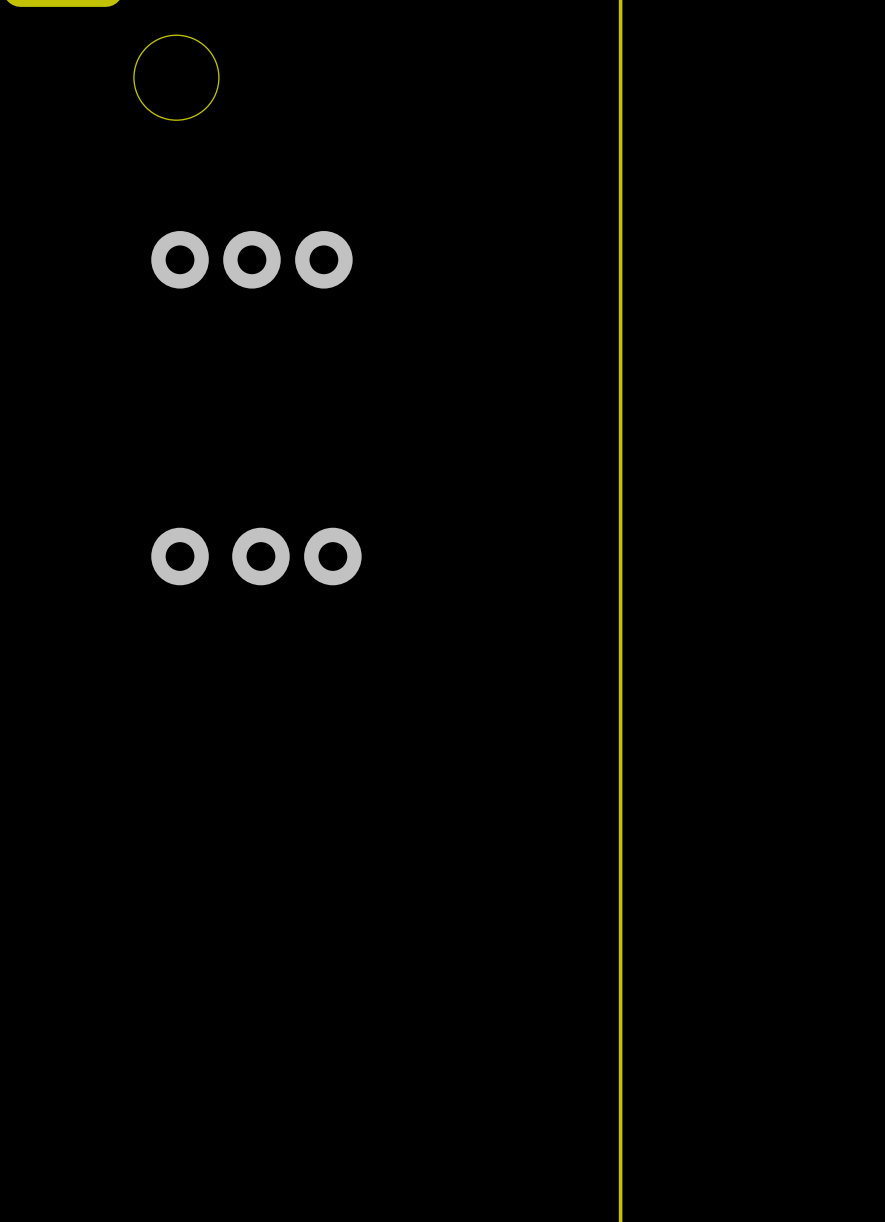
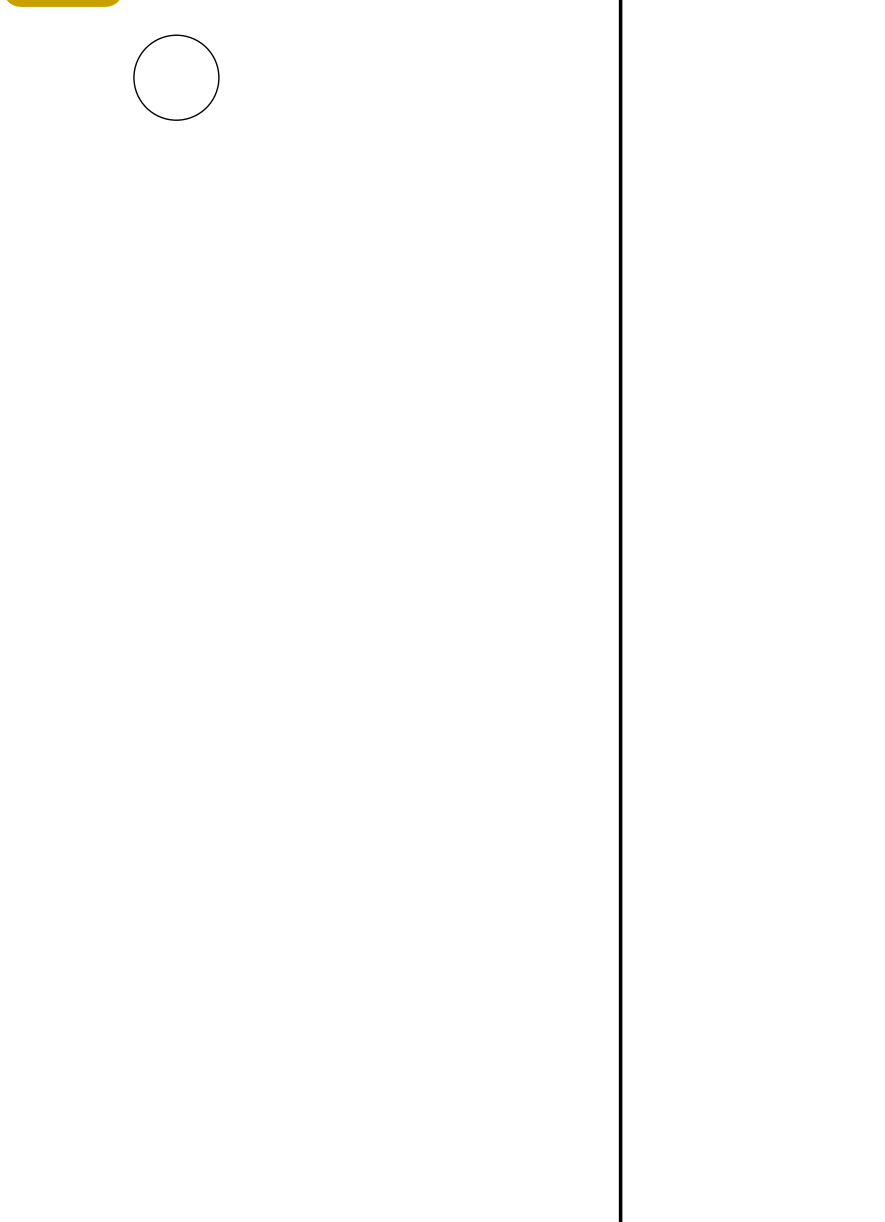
via: (180, 259) -> none
via: (251, 259) -> none
via: (323, 259) -> none
via: (180, 556) -> none
via: (260, 556) -> none
via: (332, 556) -> none

